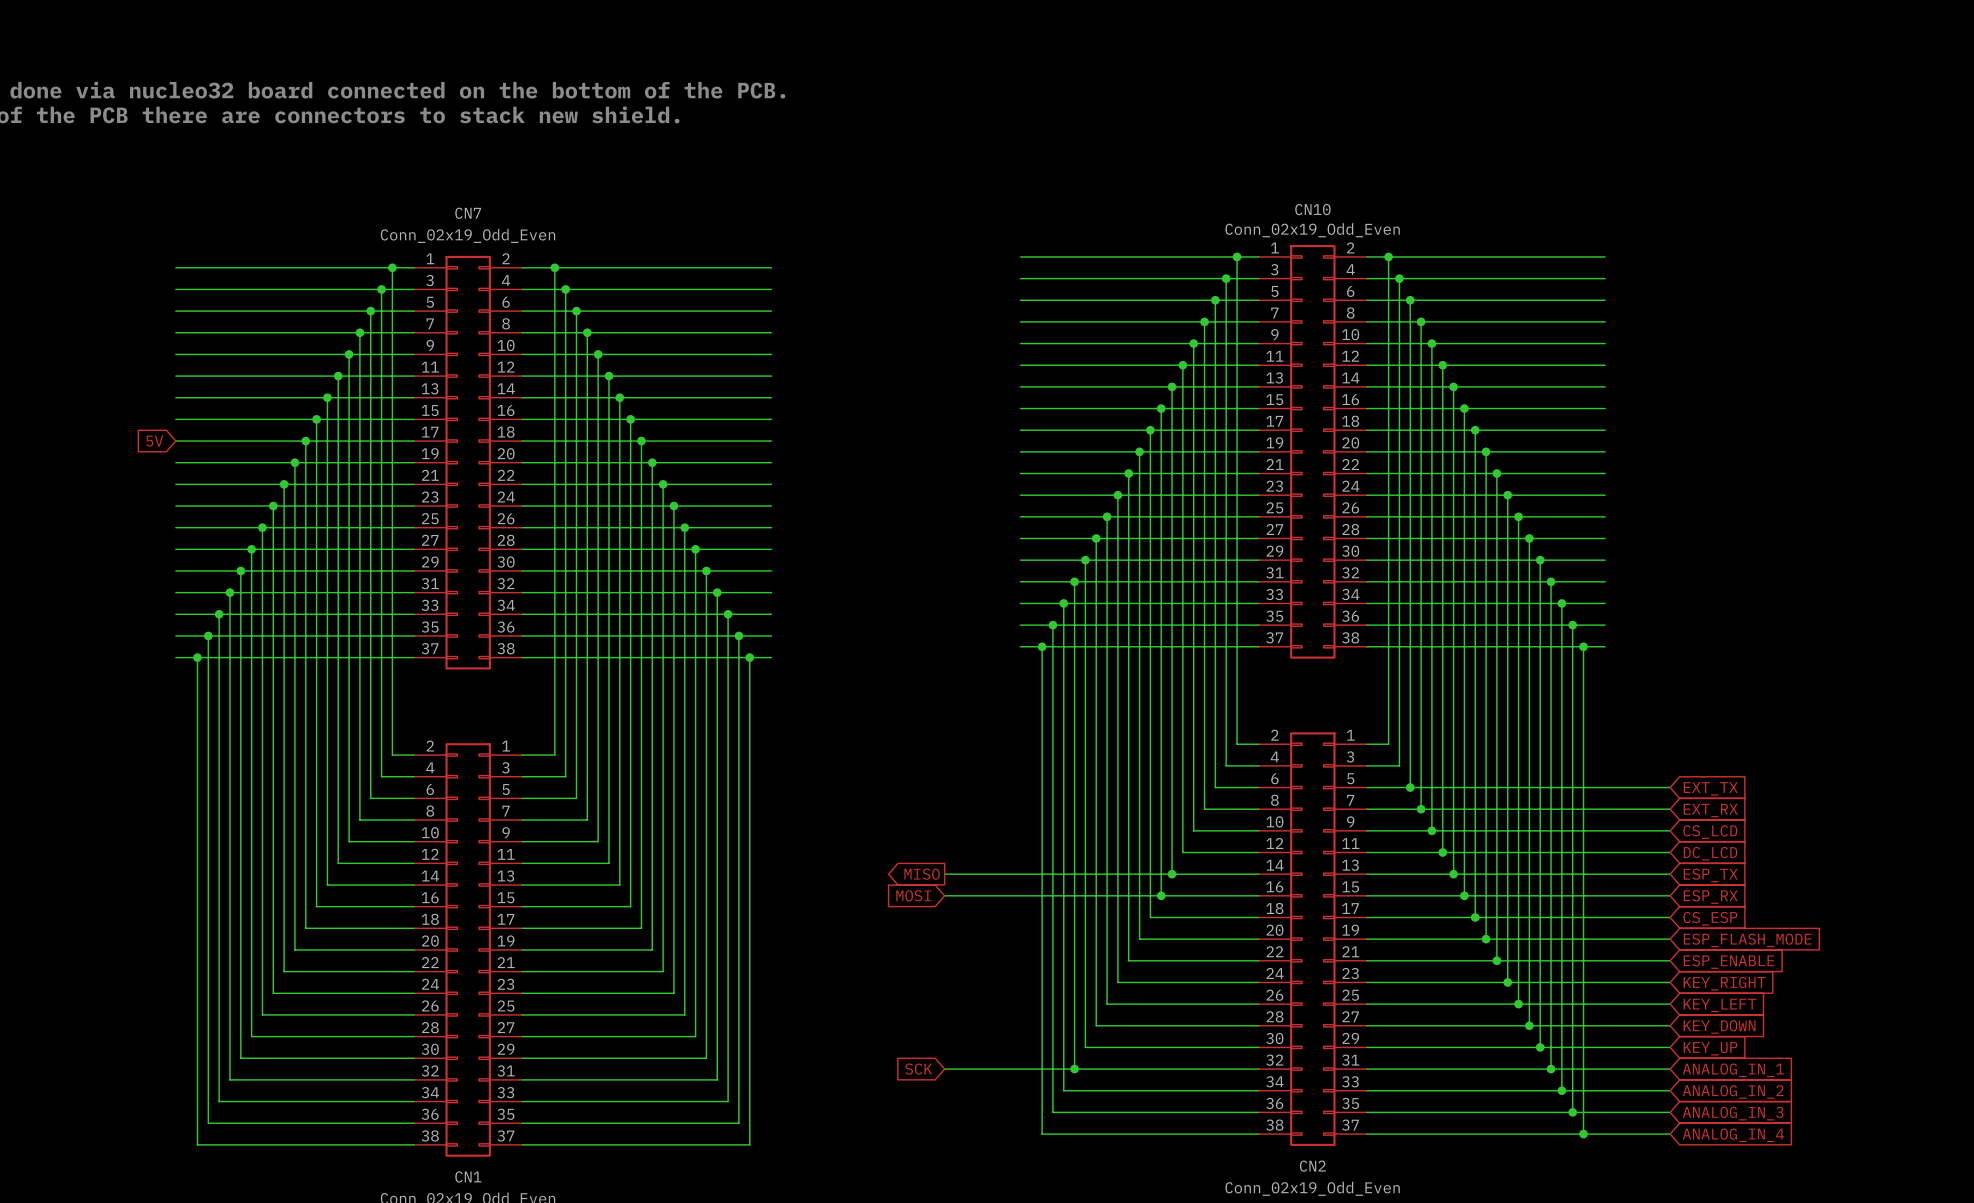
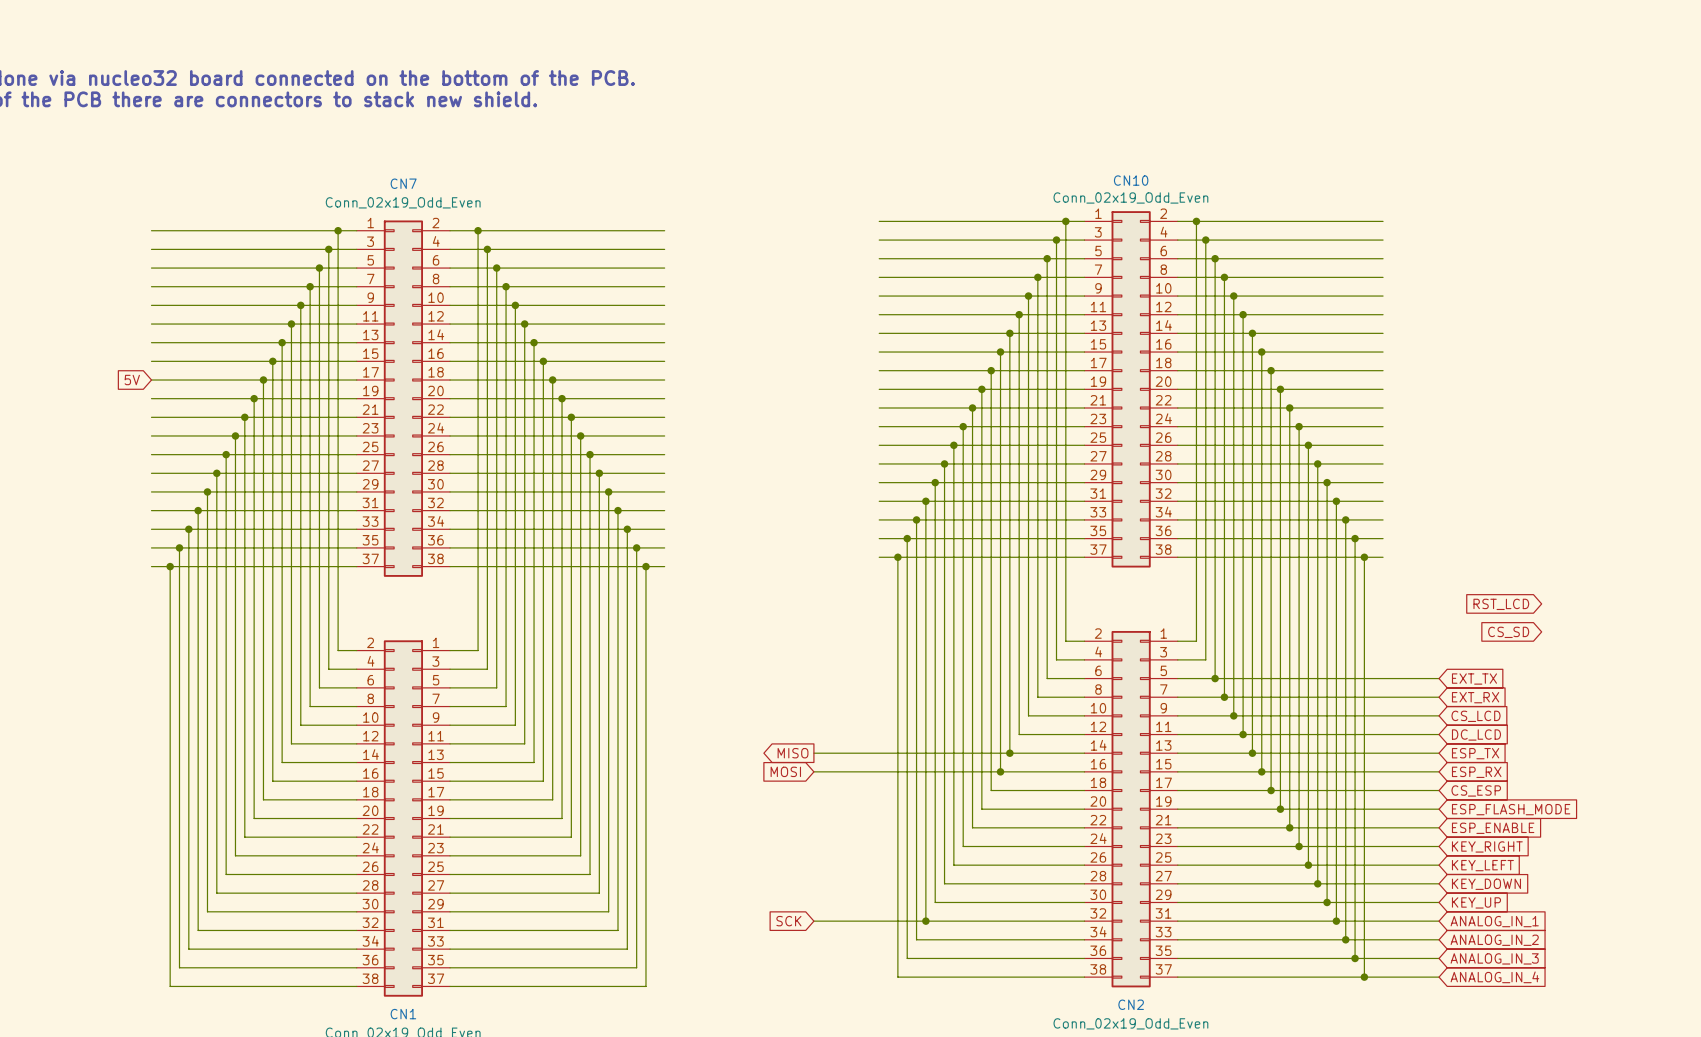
global label: none -> RST_LCD (1501, 604)
global label: none -> CS_SD (1508, 632)

